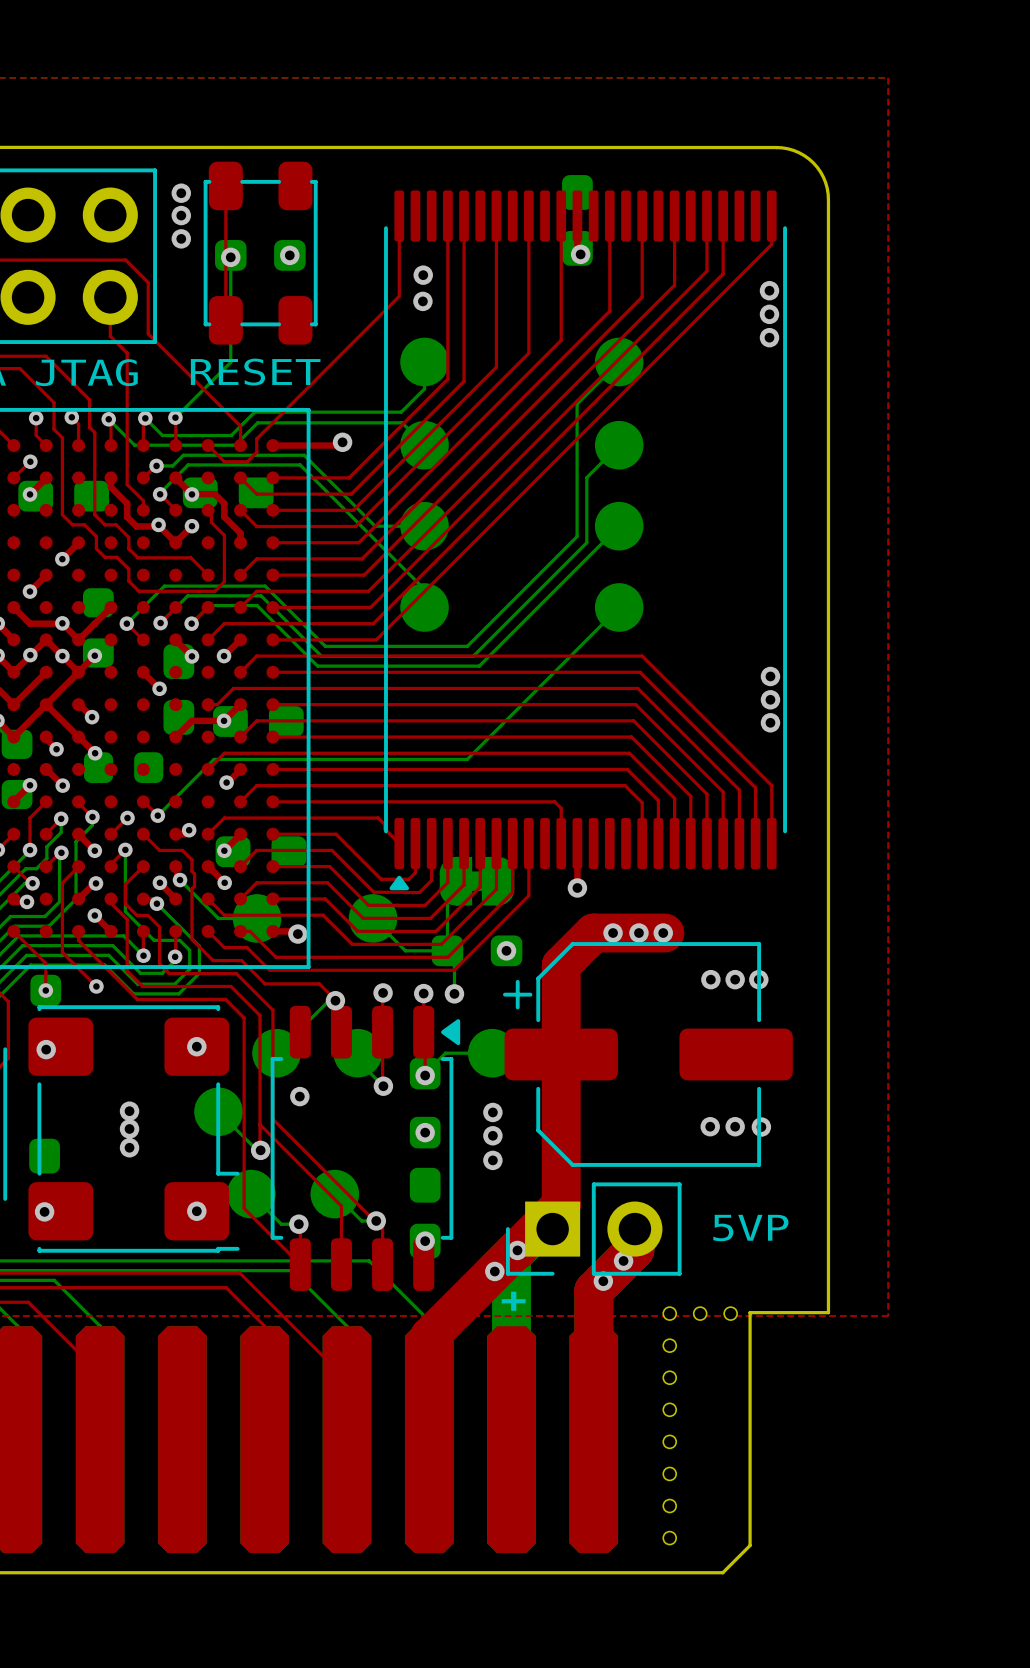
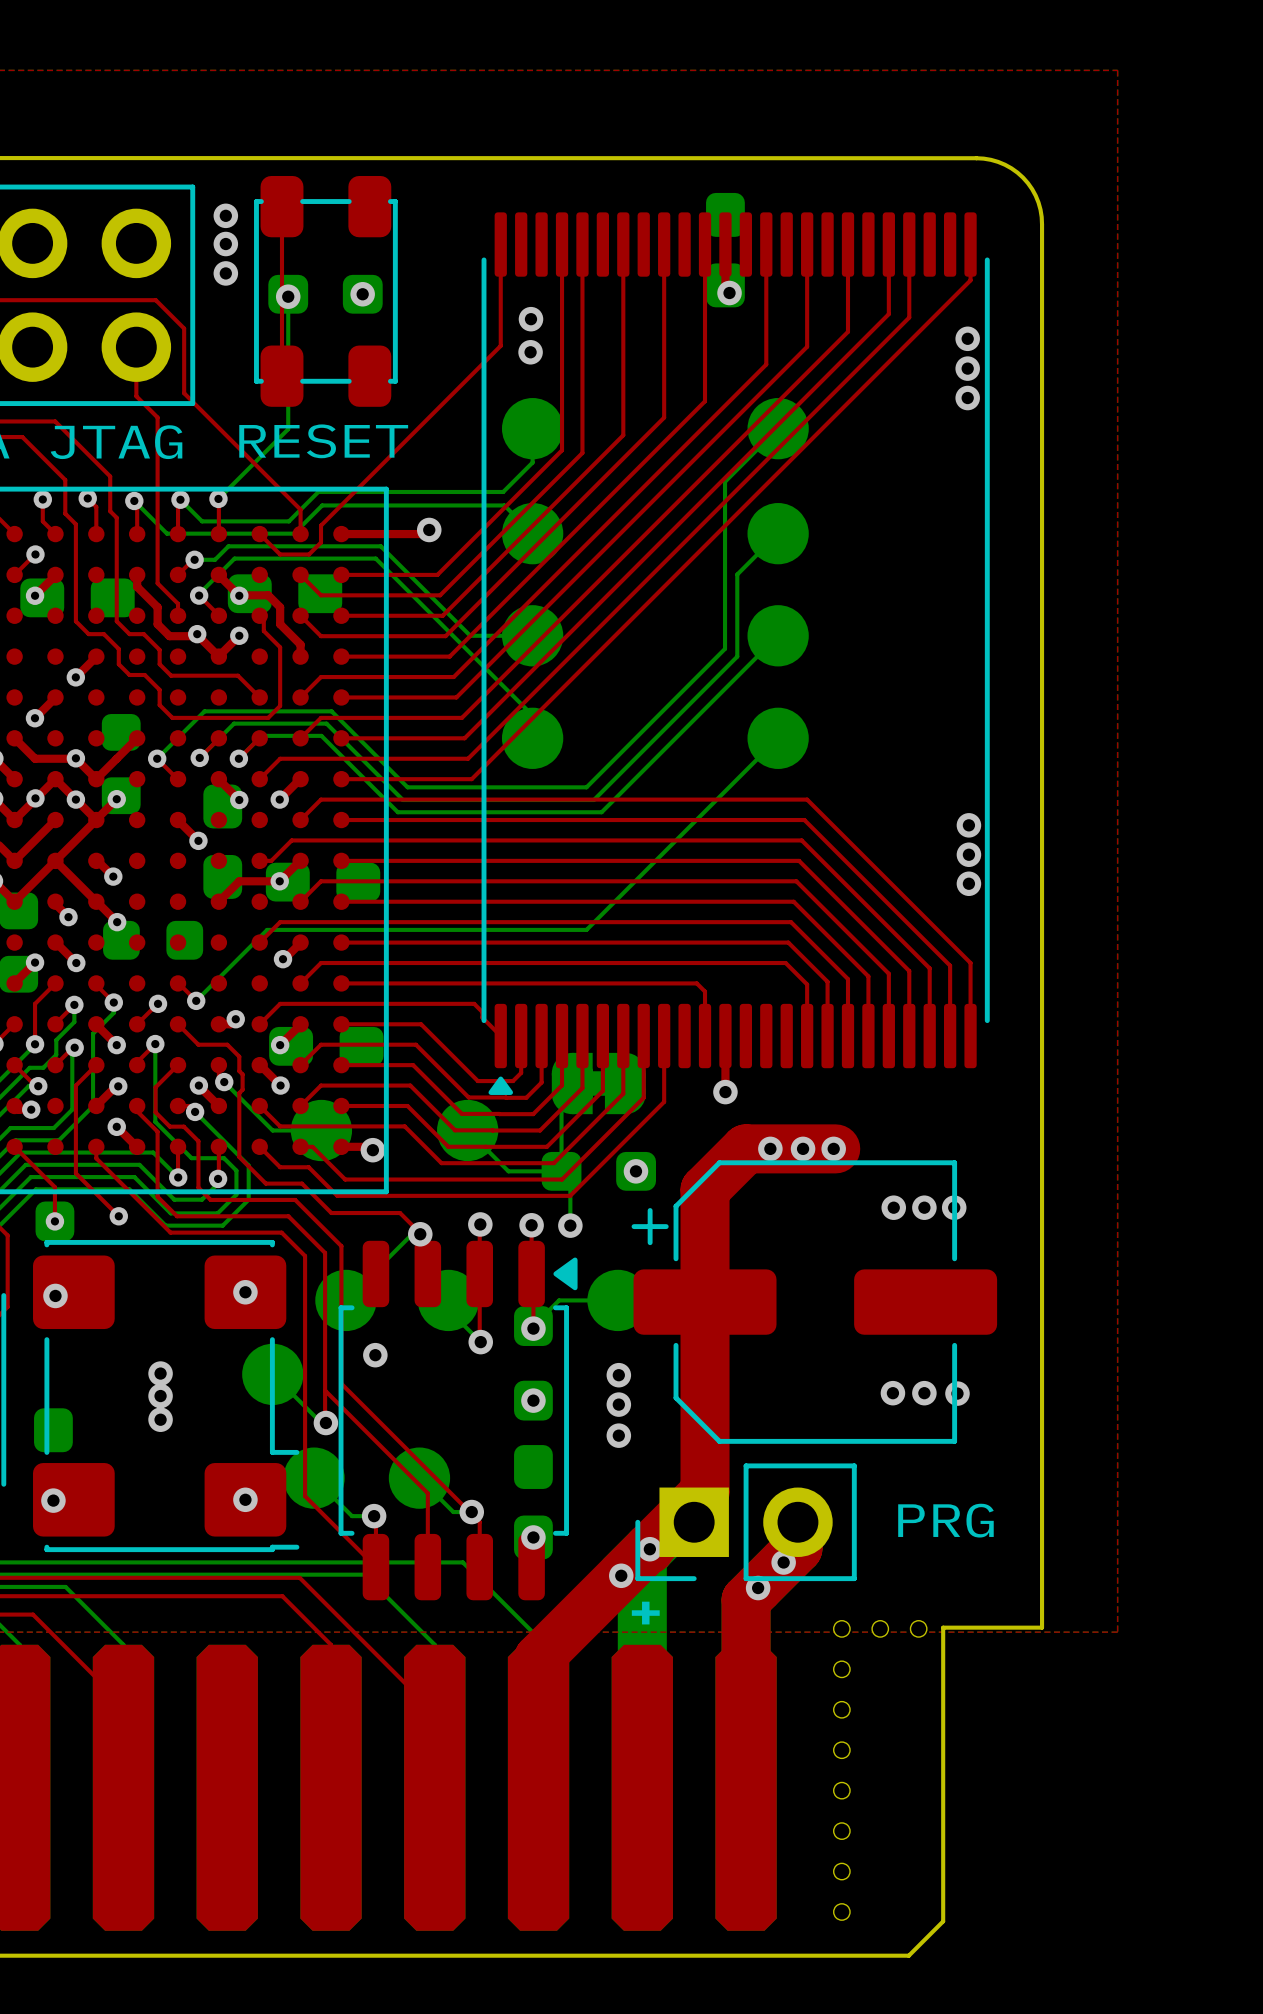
part value: 5VP (750, 1228) -> PRG (945, 1520)

